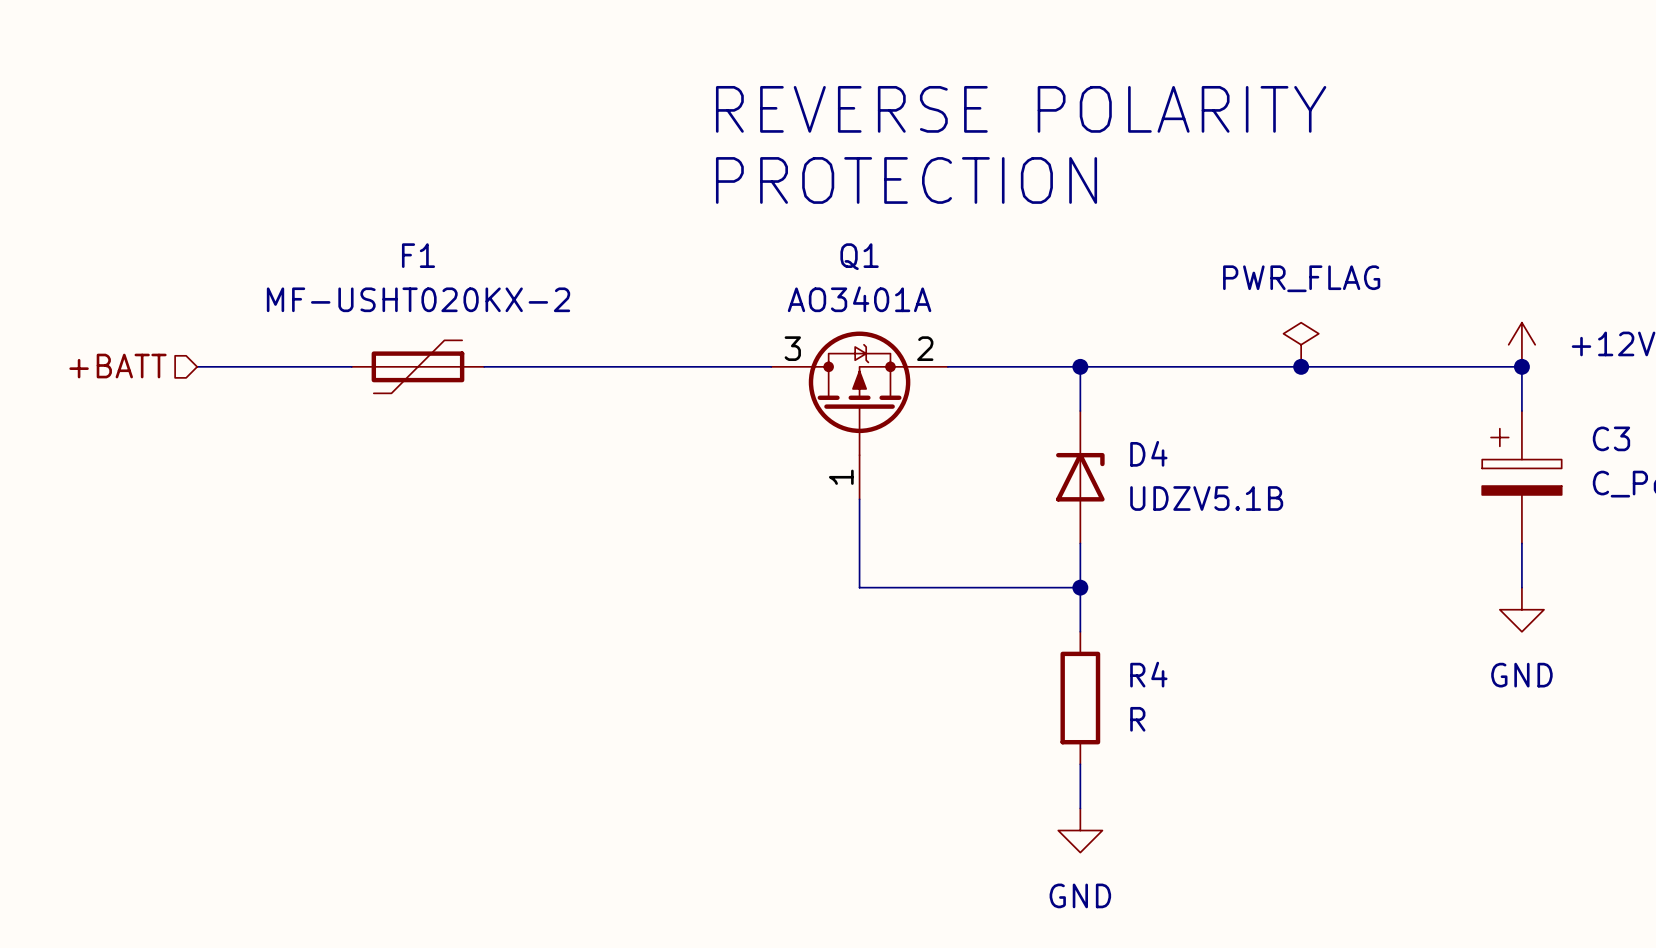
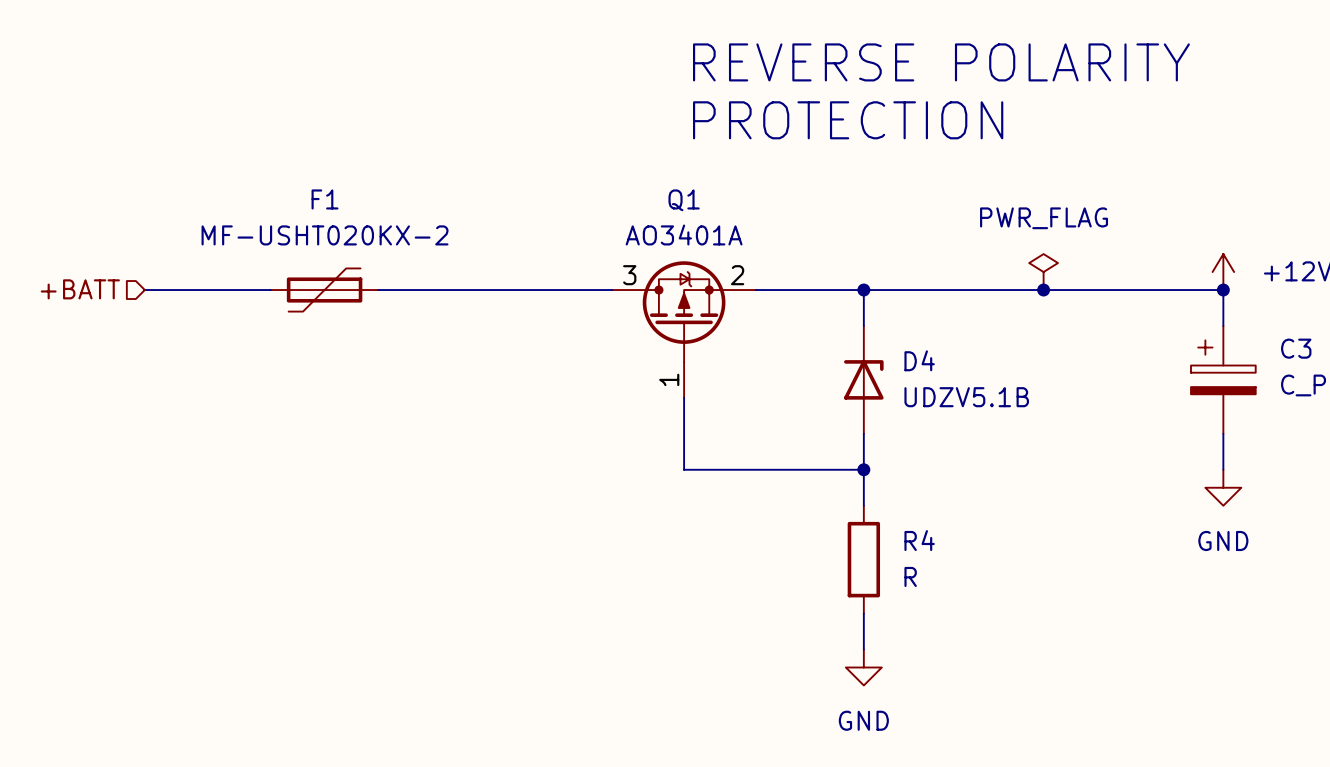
text position: REVERSE POLARITY (1021, 109) -> REVERSE POLARITY (941, 62)
text position: PROTECTION (906, 180) -> PROTECTION (848, 120)

